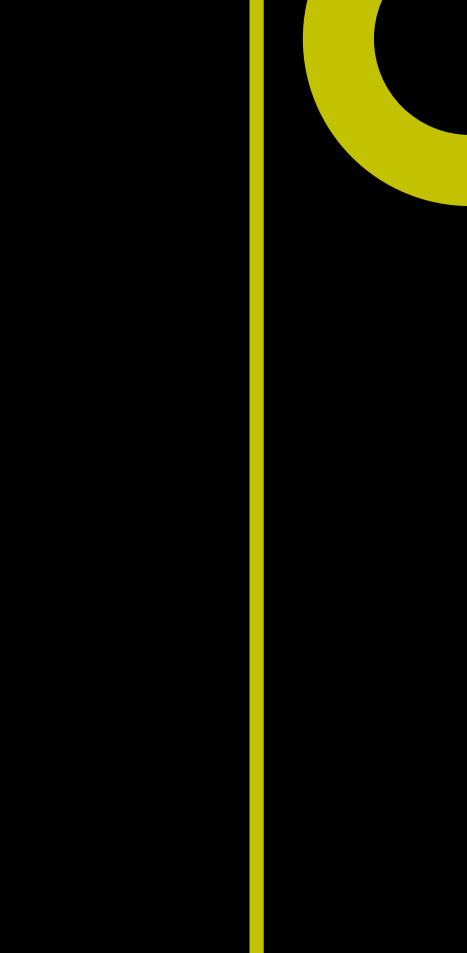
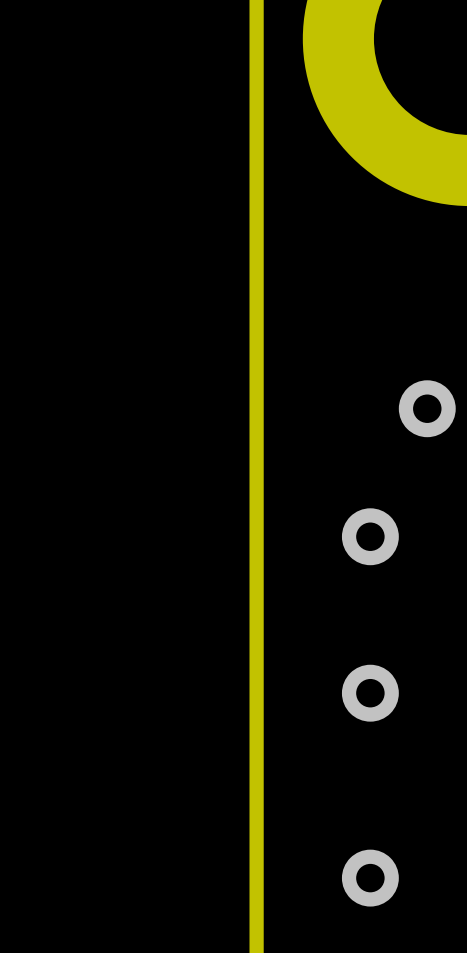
via: none -> (427, 408)
via: none -> (370, 536)
via: none -> (370, 693)
via: none -> (370, 878)

